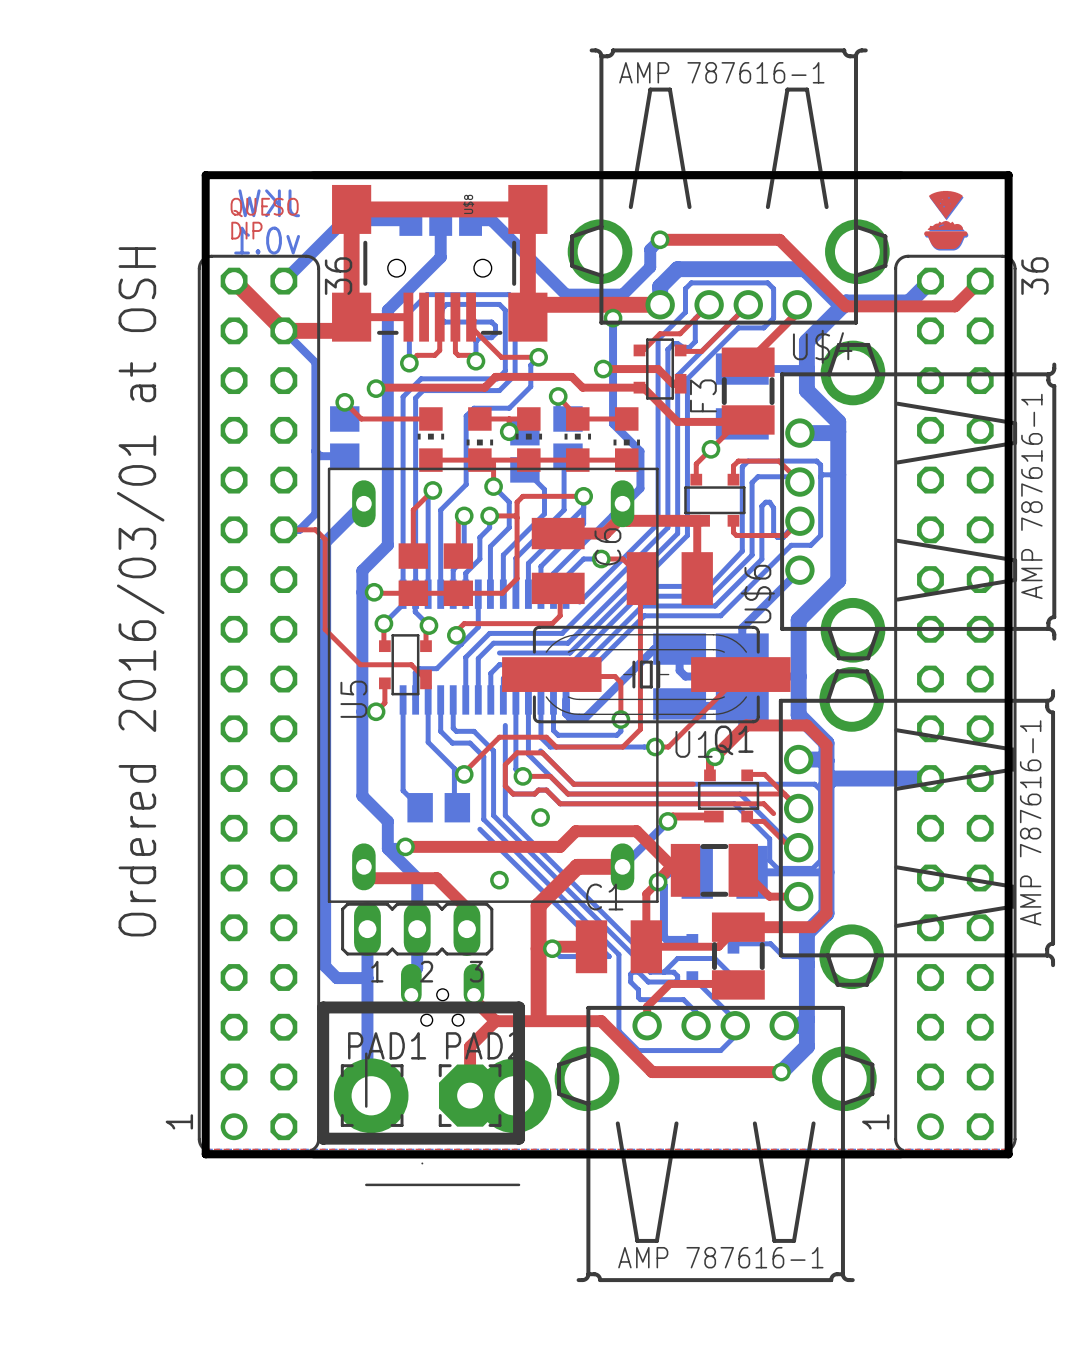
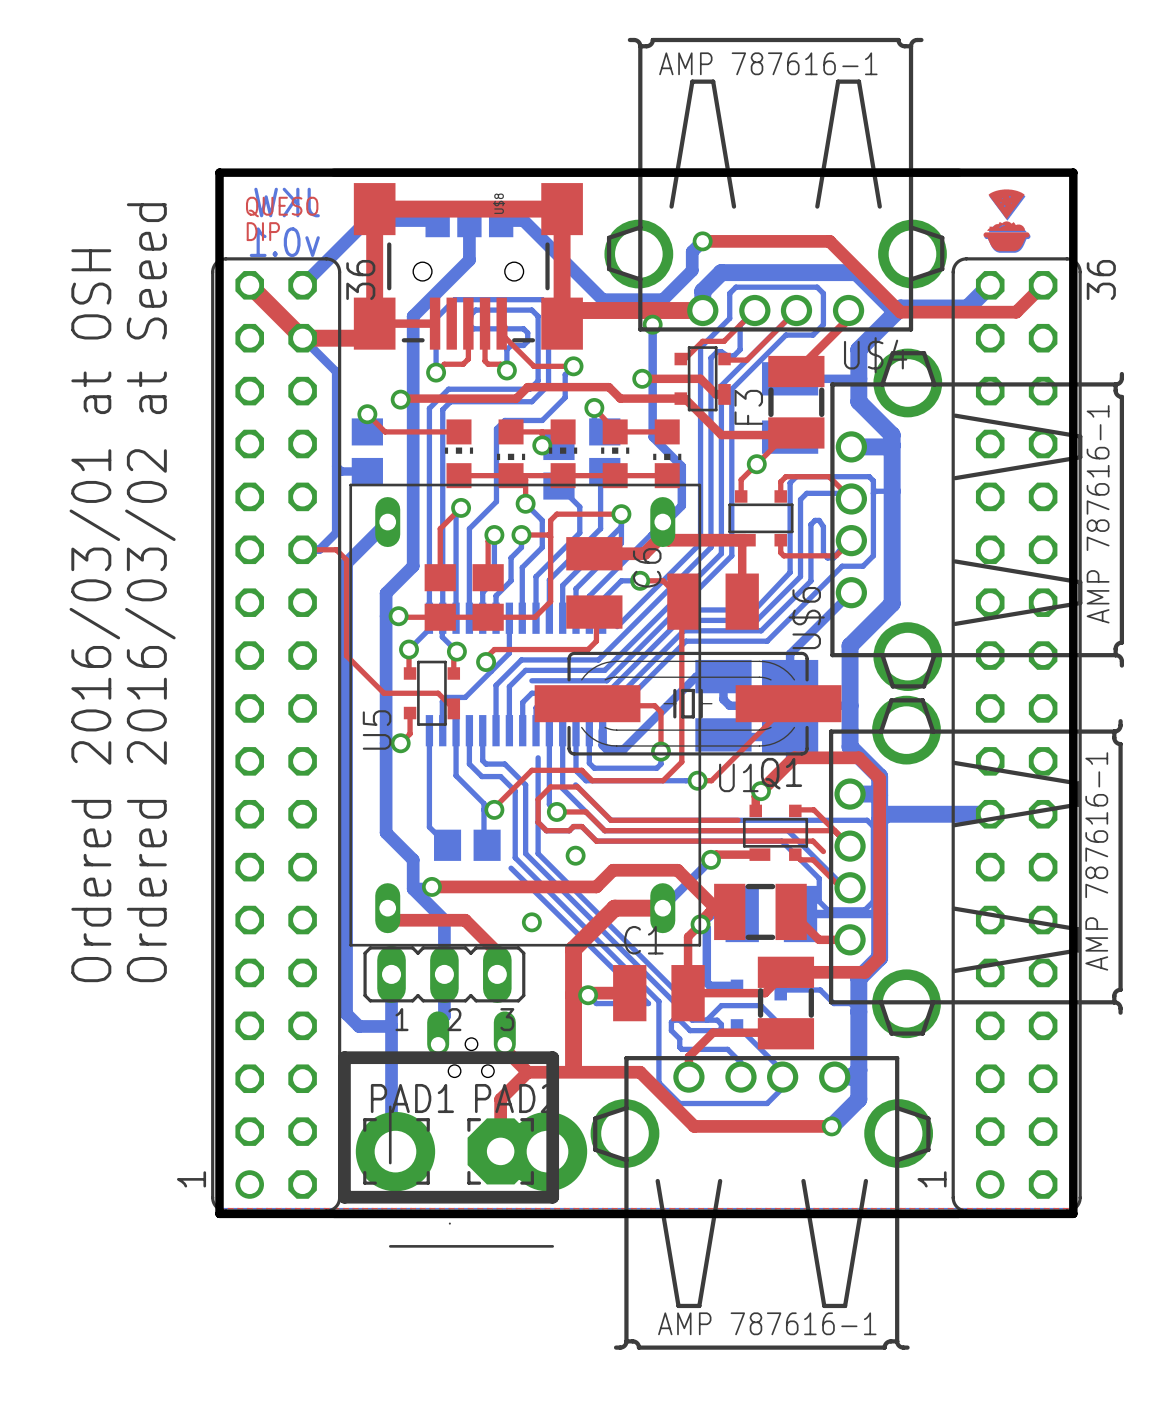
text: none -> Ordered 2016/03/01 at OSH (94, 615)
text: Ordered 2016/03/01 at OSH (140, 591) -> Ordered 2016/03/02 at Seeed (150, 592)

